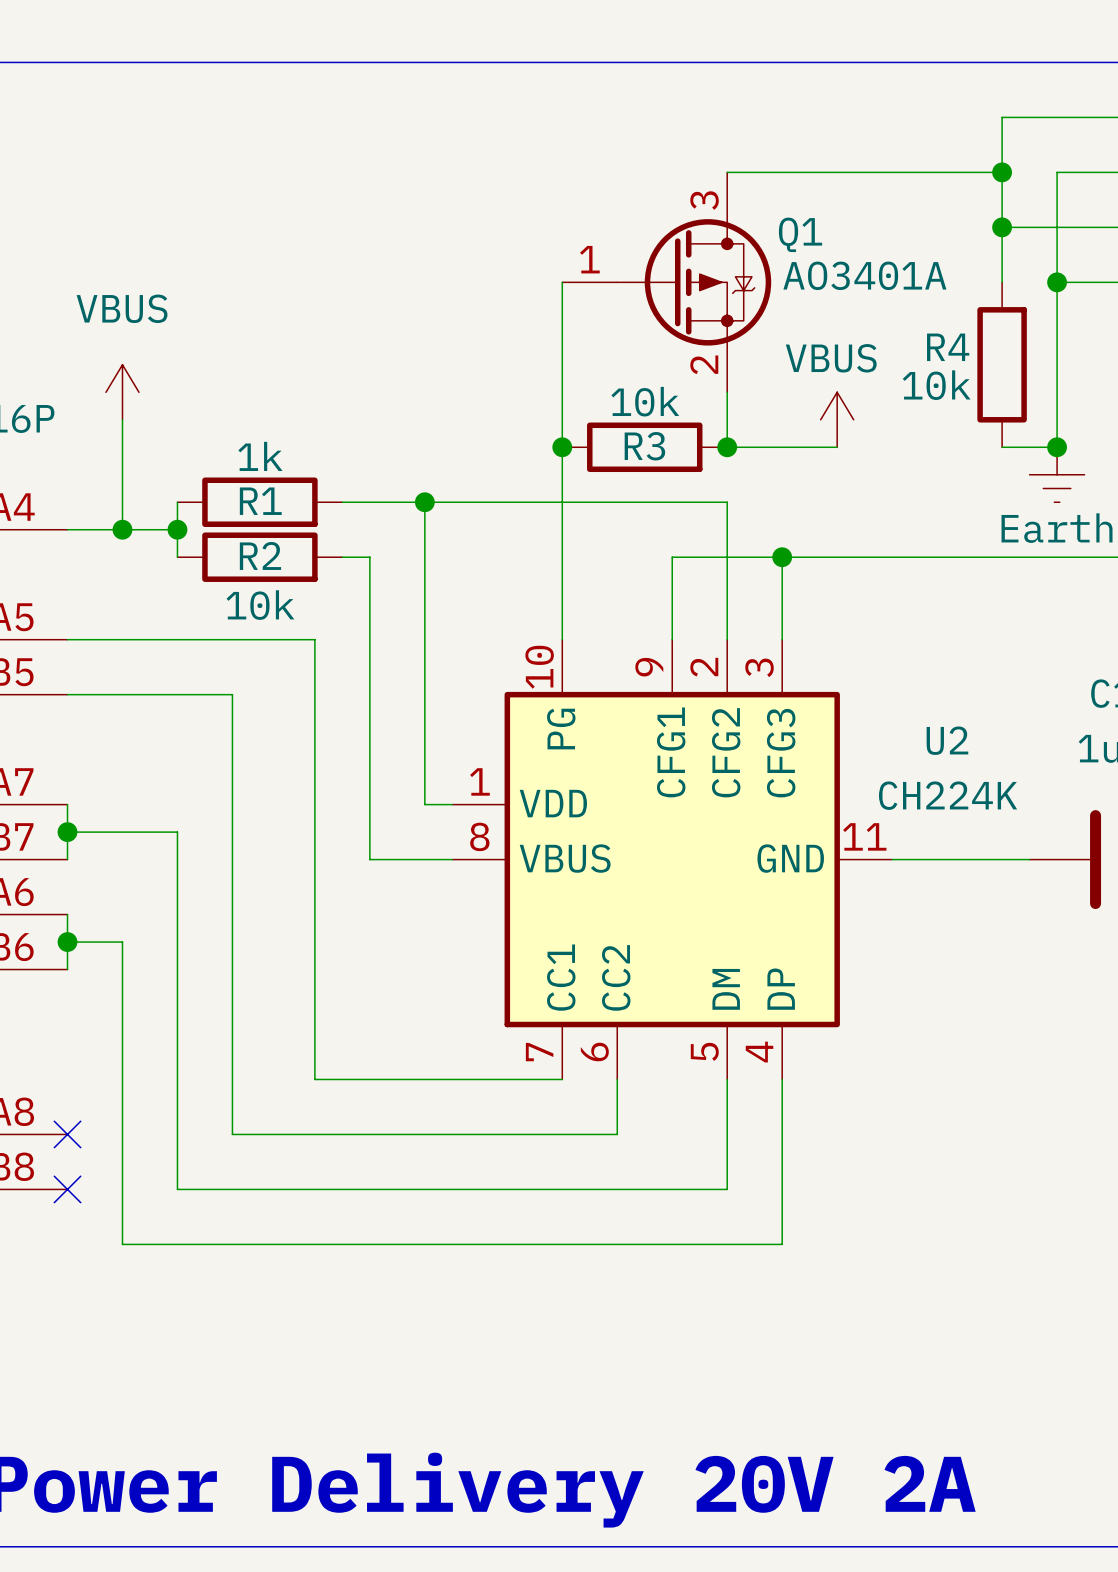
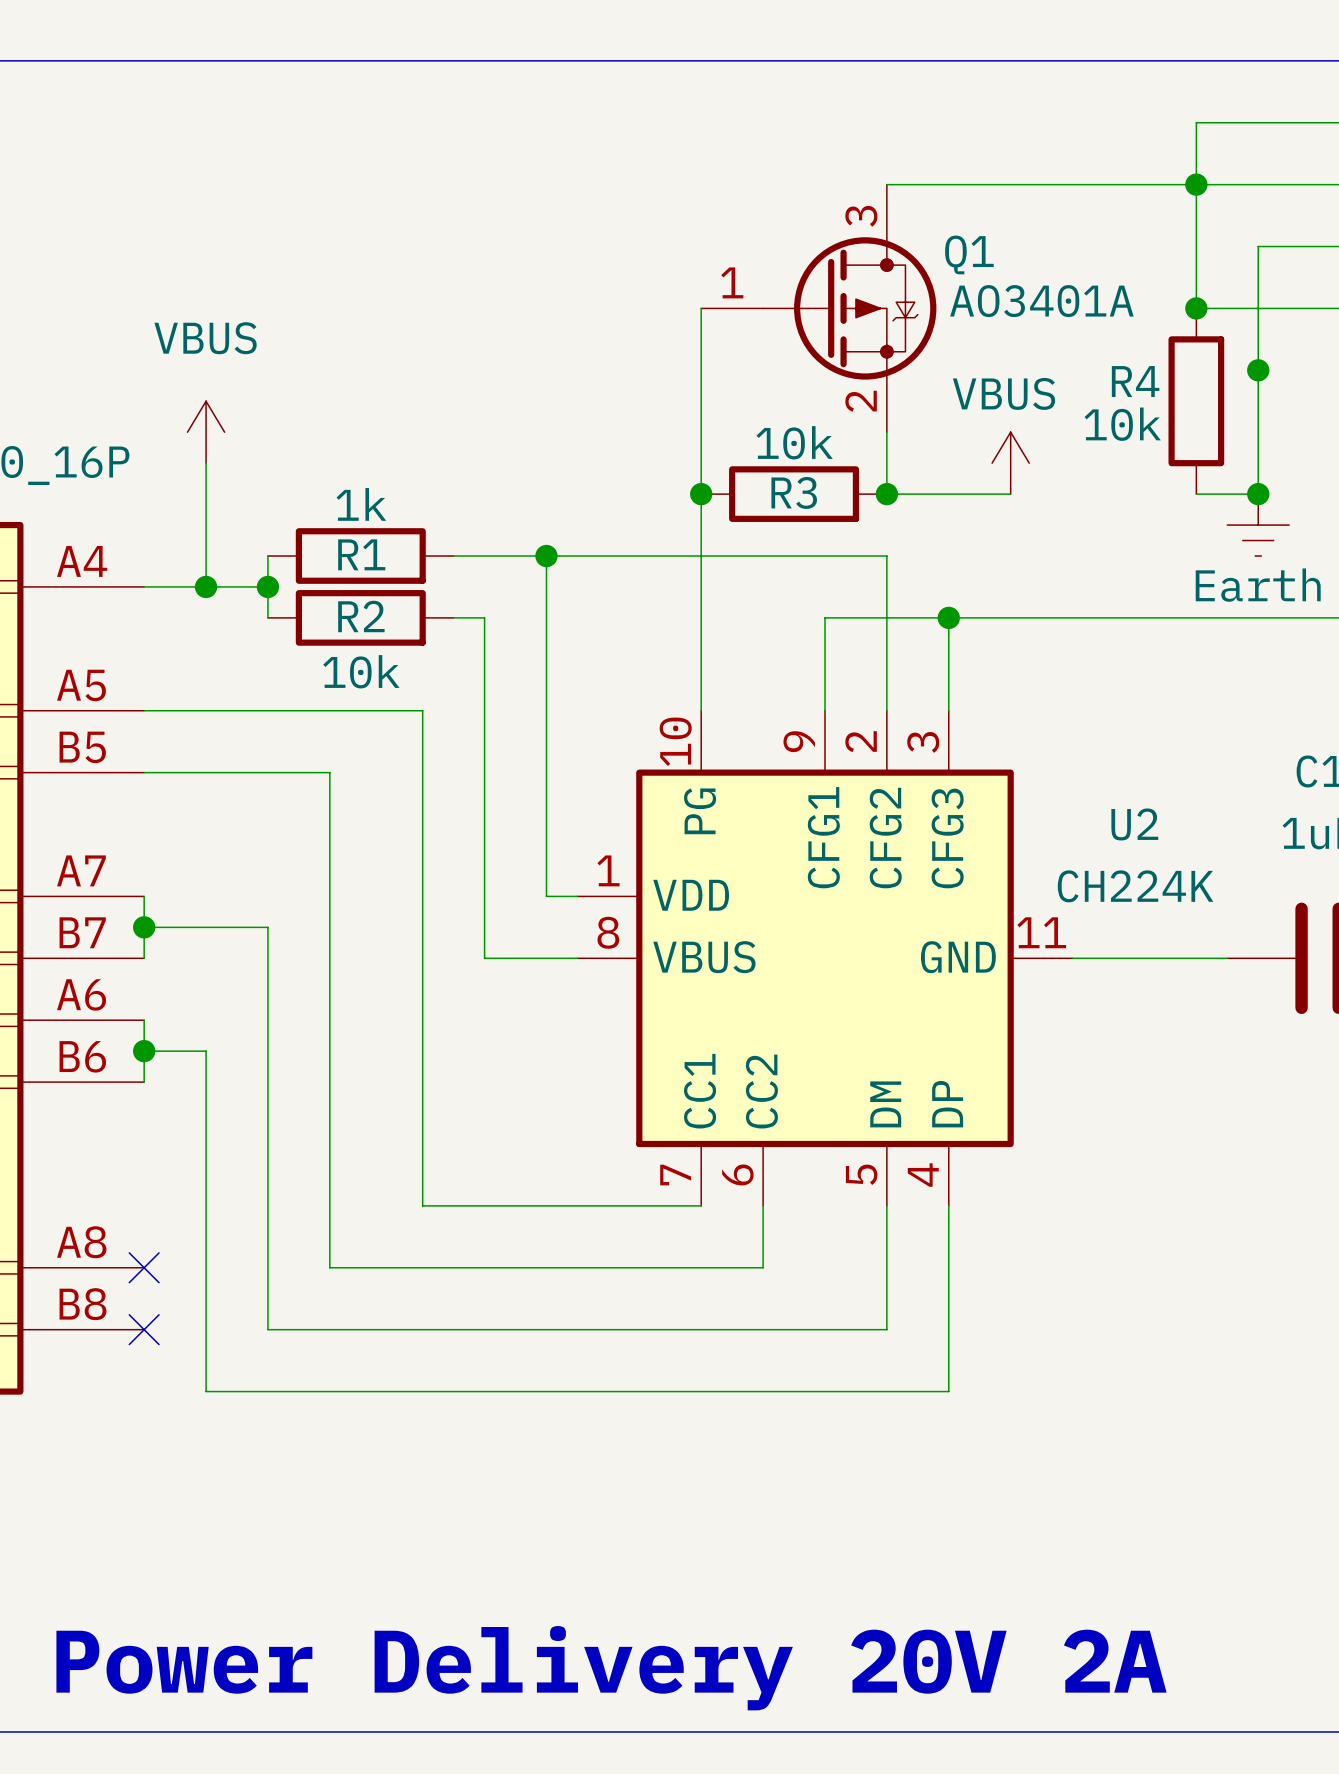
wire: (1057, 172) (1057, 227) (1002, 227) -> (1258, 184) (1196, 184)
junction: (1002, 227) -> none
wire: none -> (1196, 308) (1258, 308)
junction: none -> (1196, 308)
junction: (1057, 282) -> none
junction: none -> (1258, 370)

